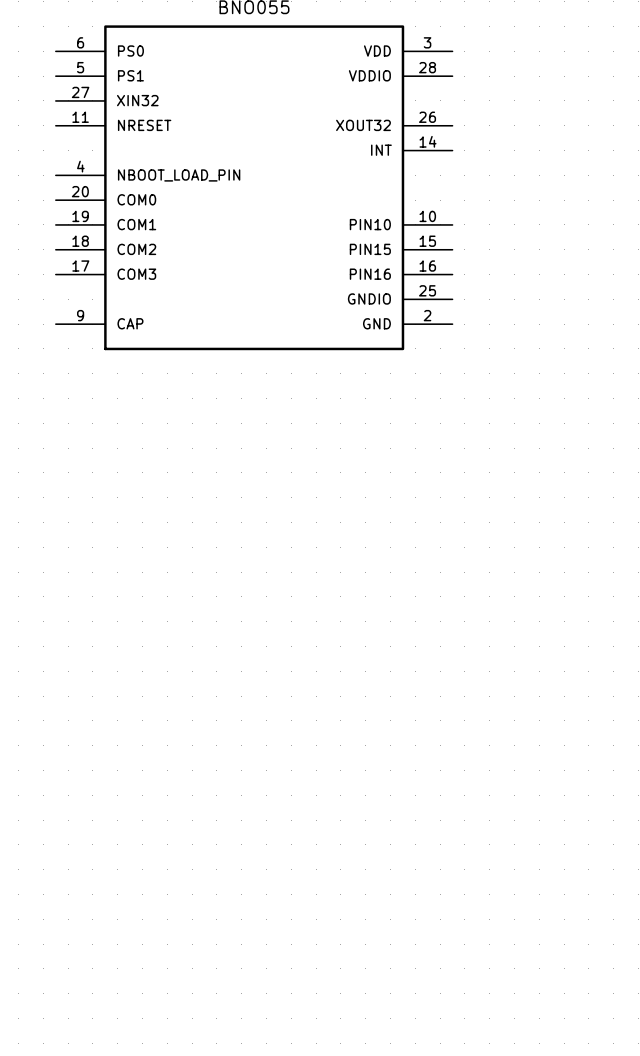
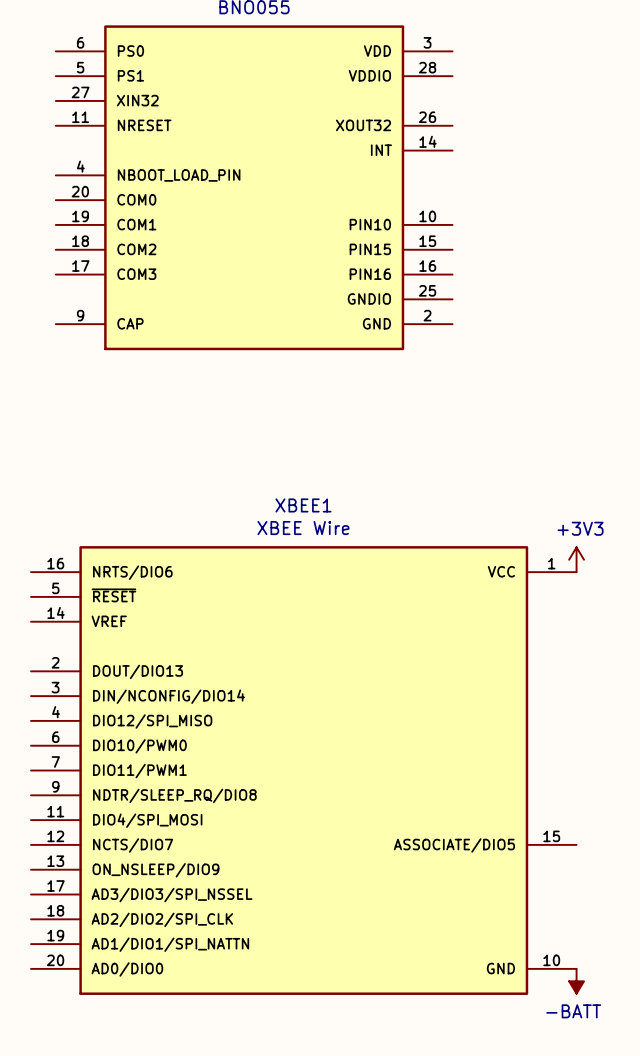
power symbol: none -> +3V3 (576, 559)
XBEE1: none -> XBEE Wire (303, 770)
power symbol: none -> -BATT (576, 981)

